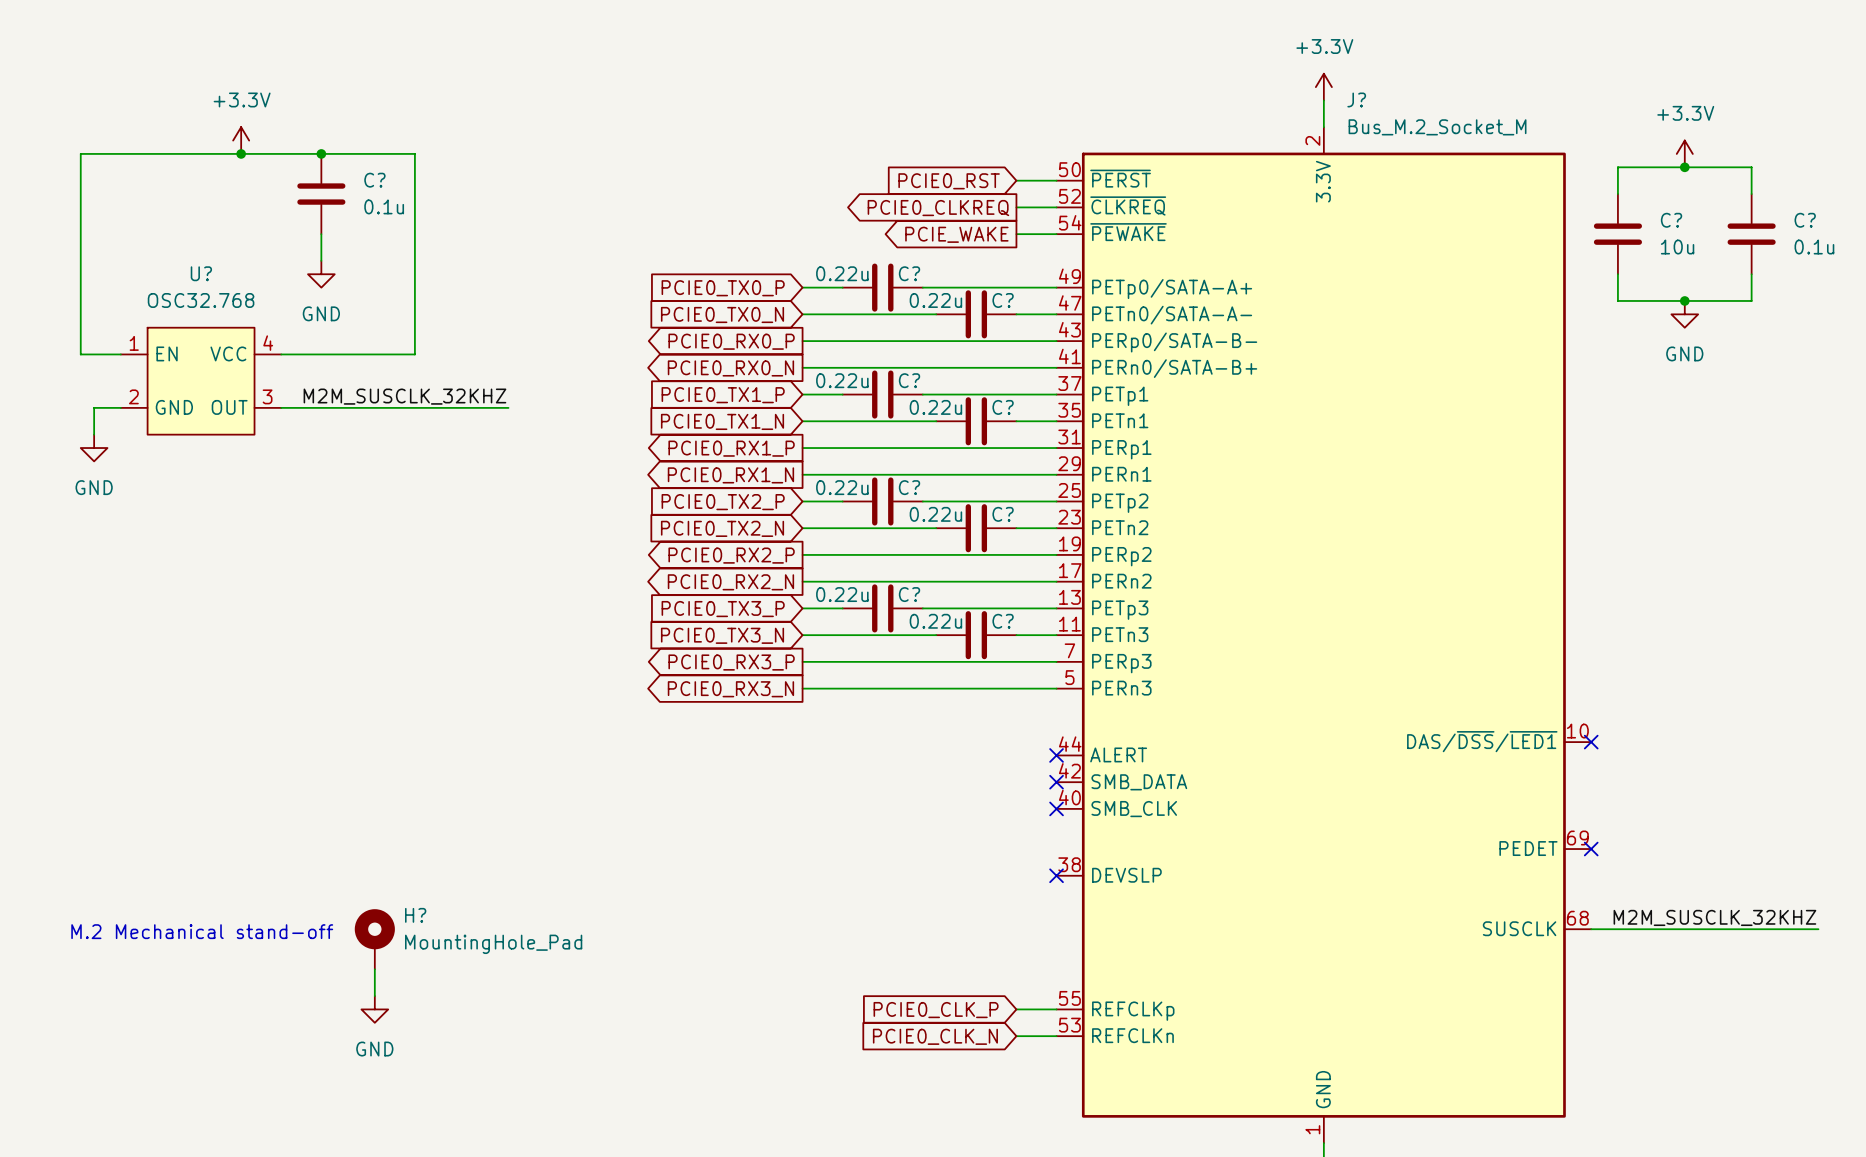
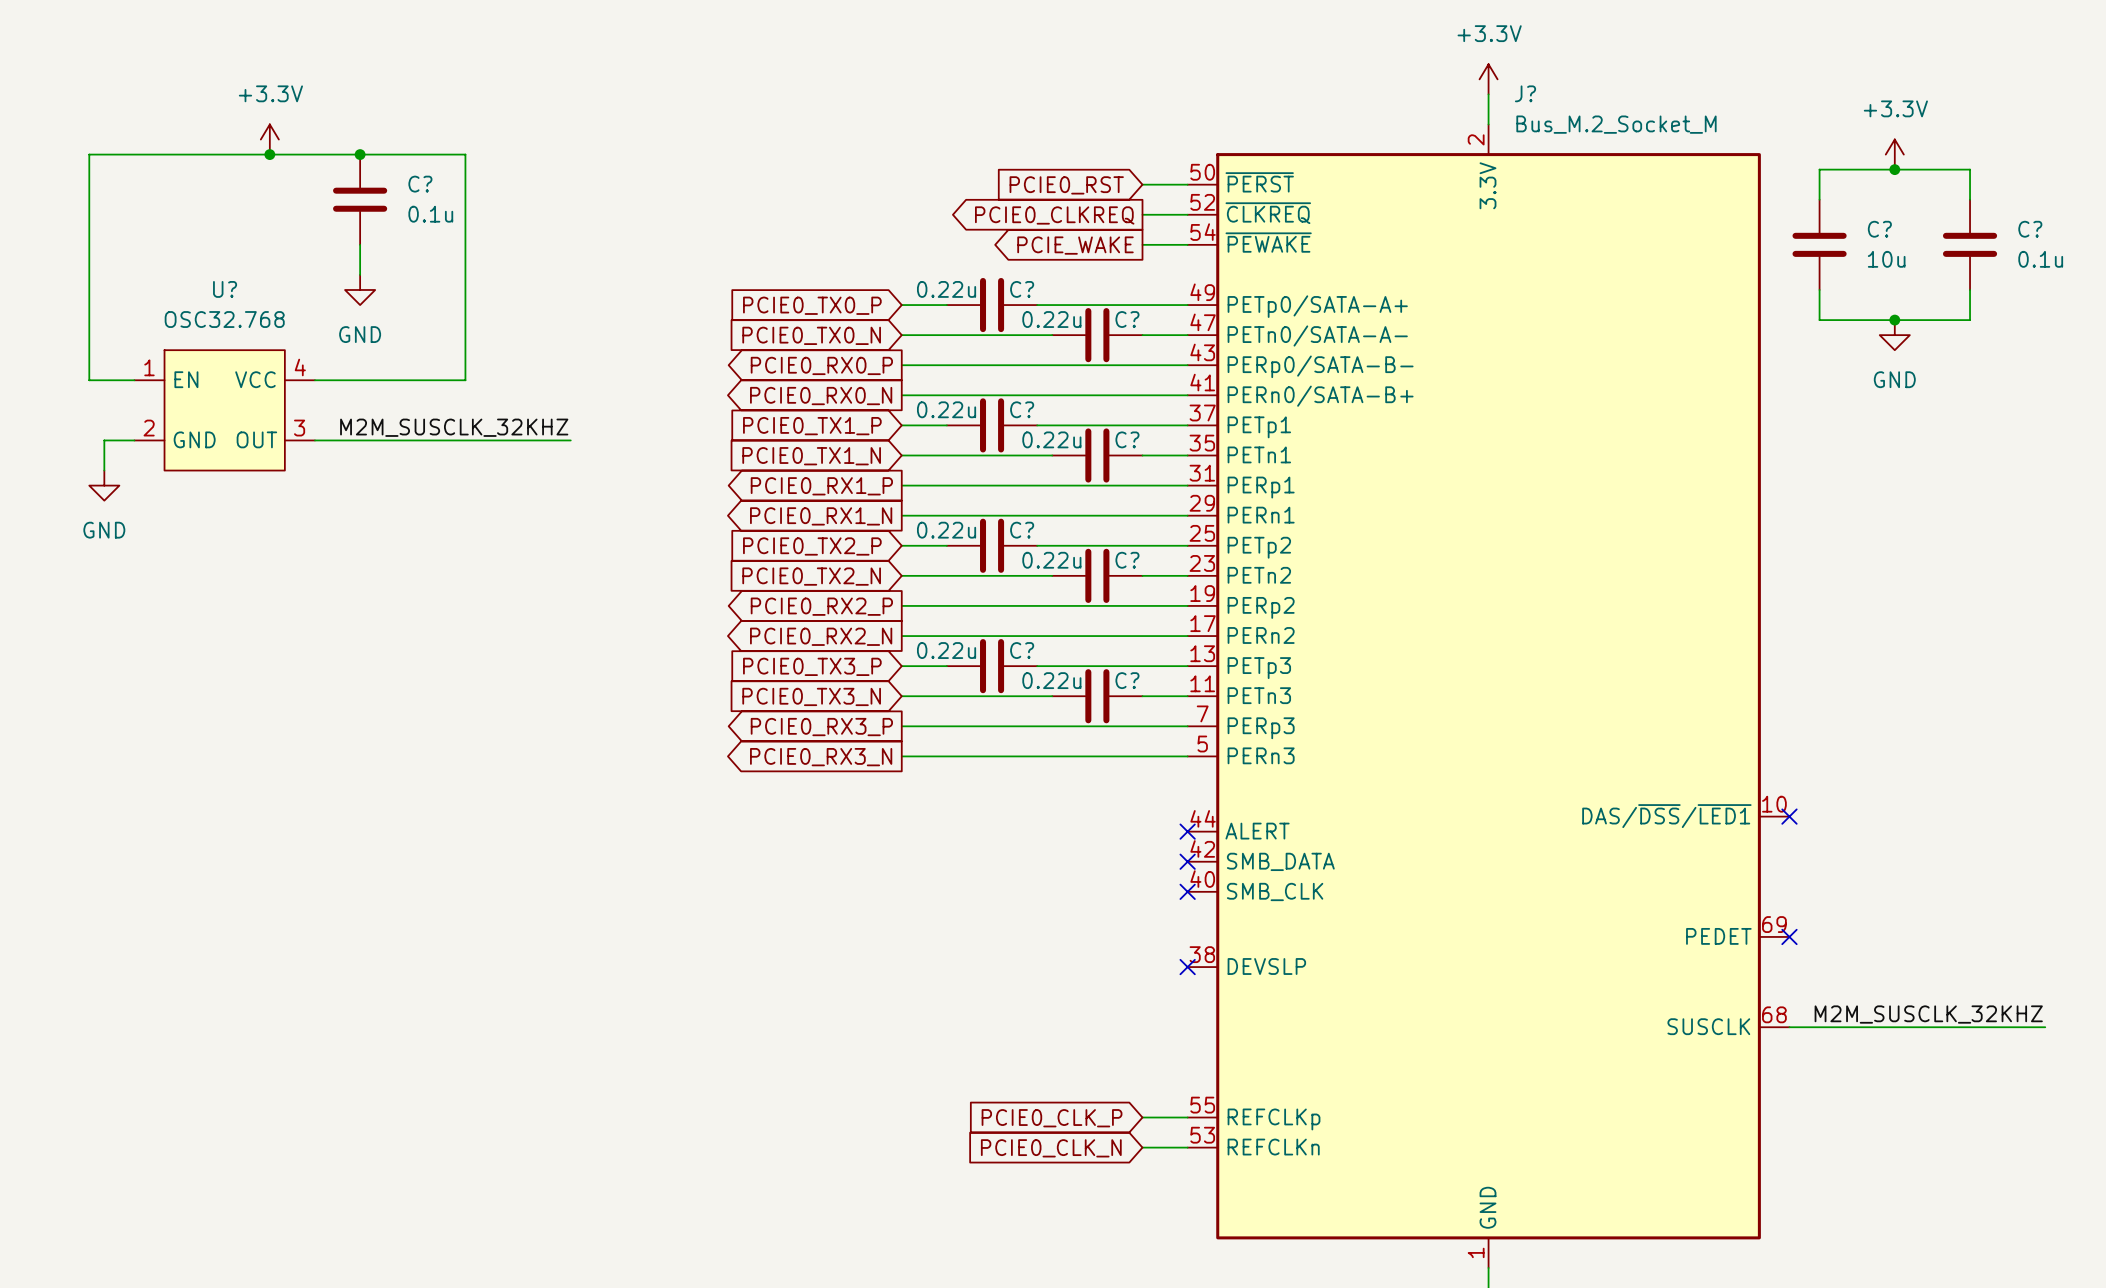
text: M.2 Mechanical stand-off (202, 931) -> none
H?: MountingHole_Pad (374, 939) -> none
wire: (374, 969) (374, 996) -> none
power symbol: GND (374, 1009) -> none

